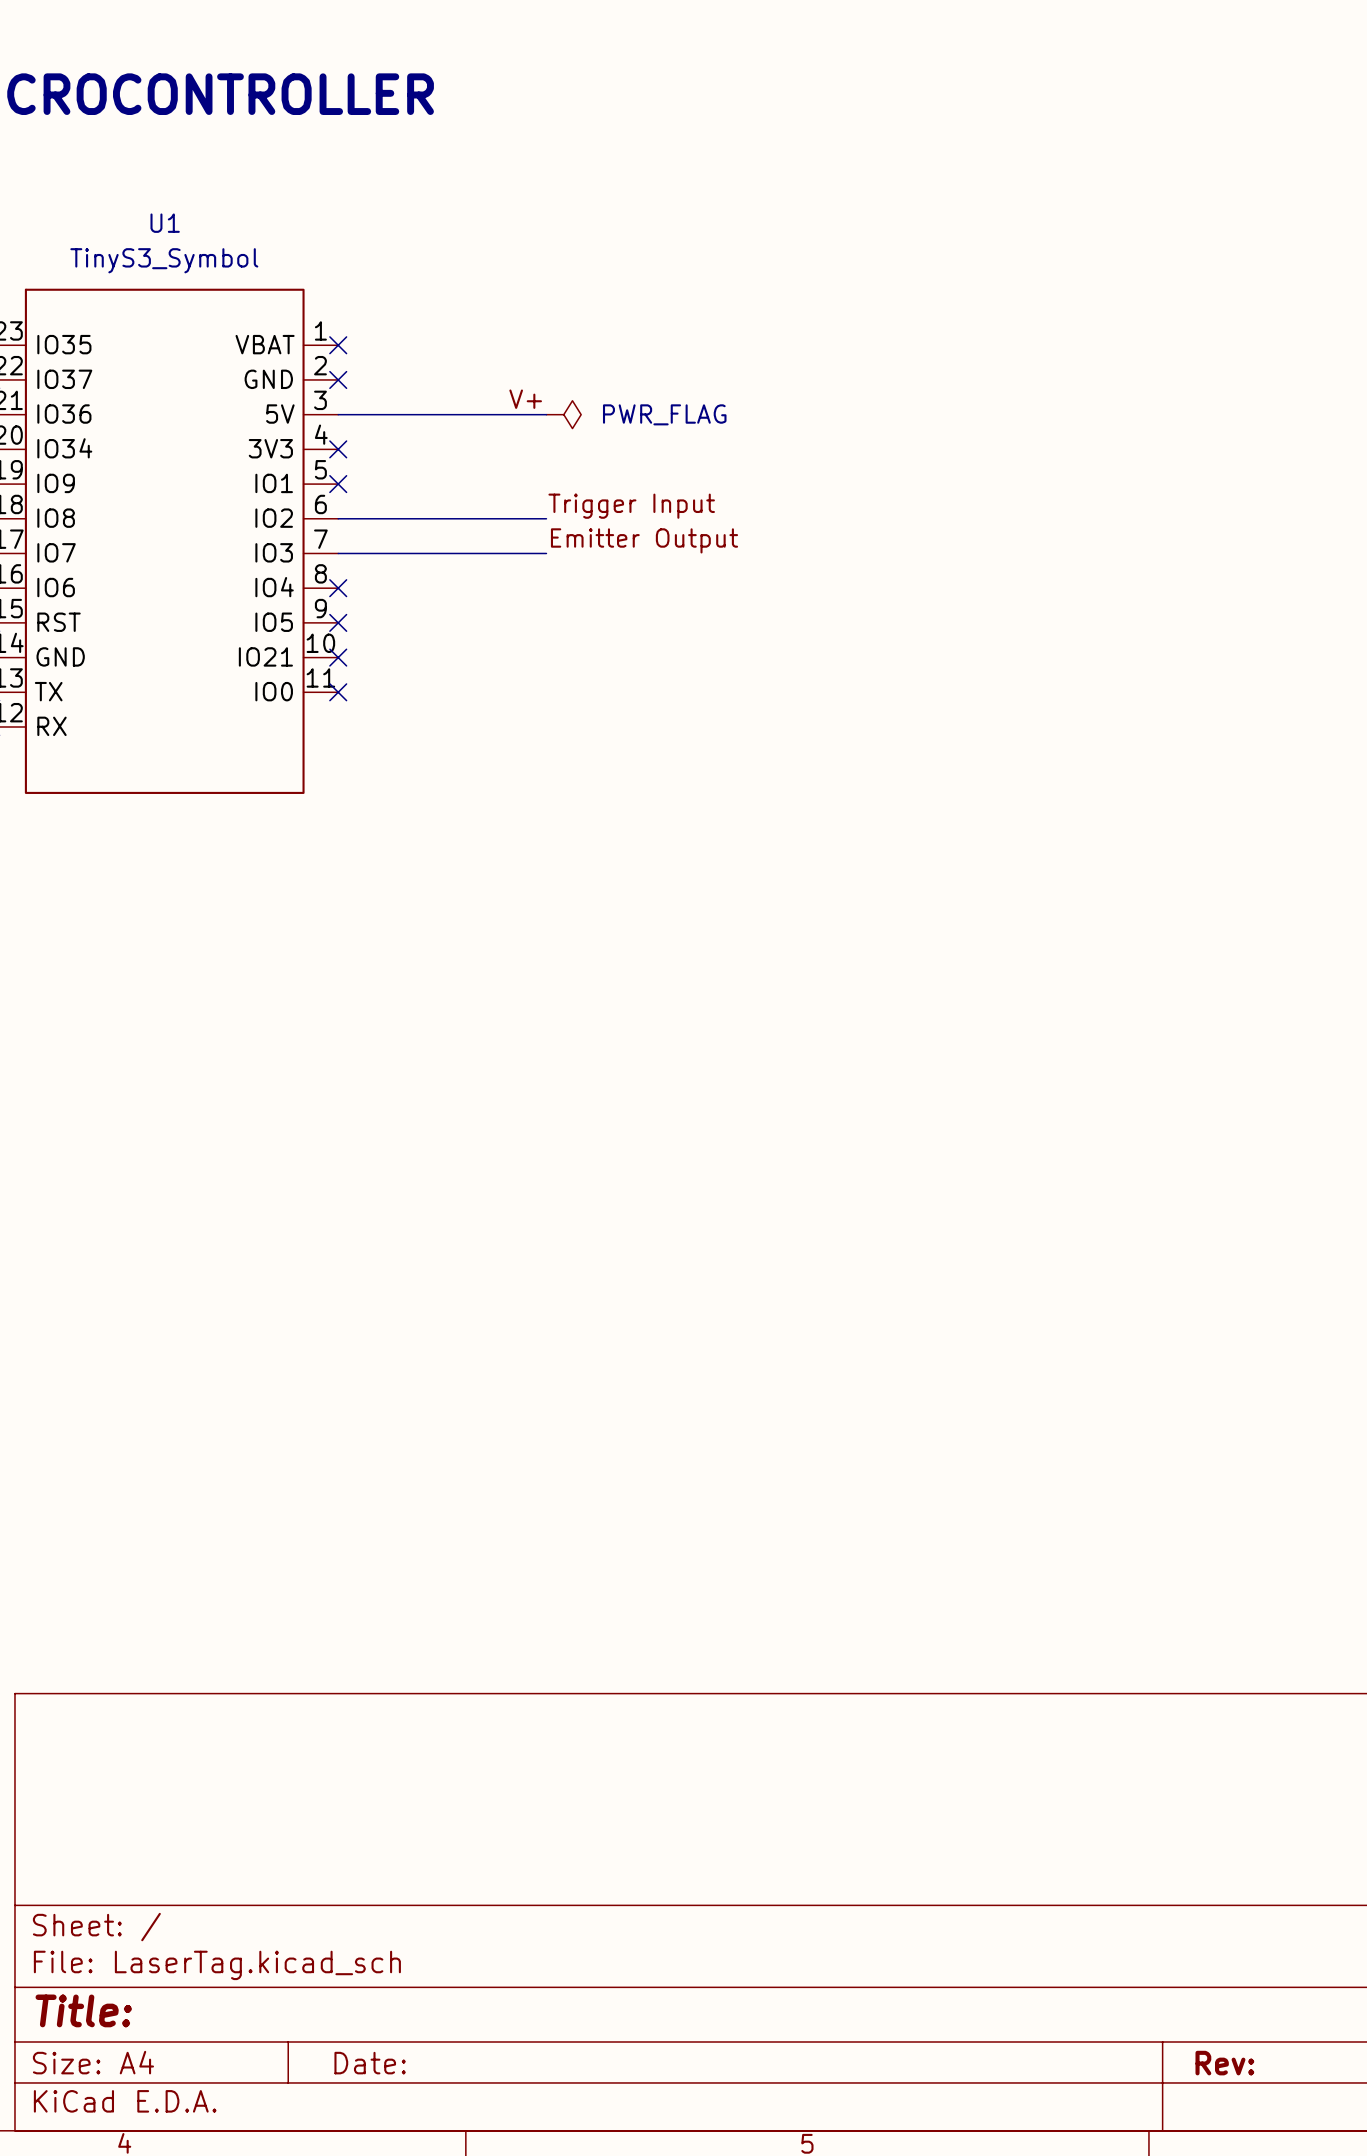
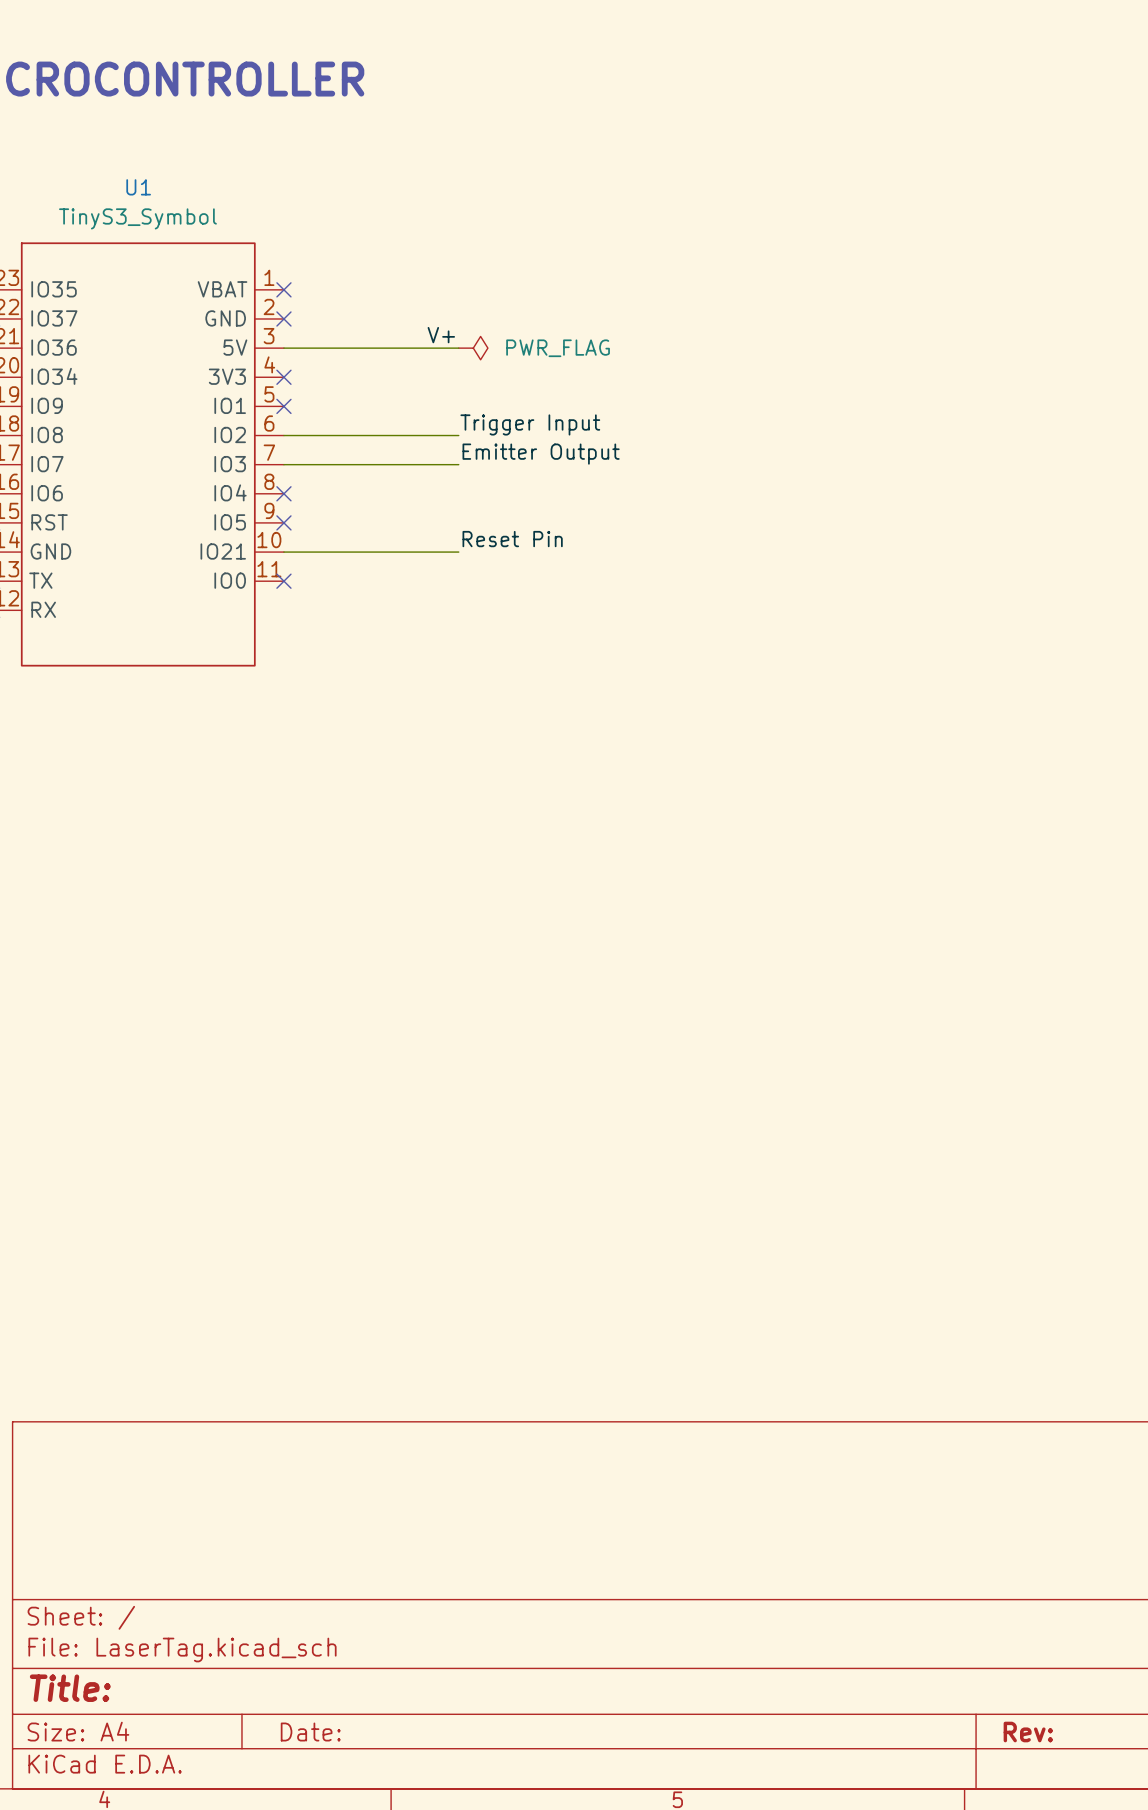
label: none -> Reset Pin (512, 539)
wire: none -> (283, 552) (458, 552)
no-connect mark: (338, 657) -> none

